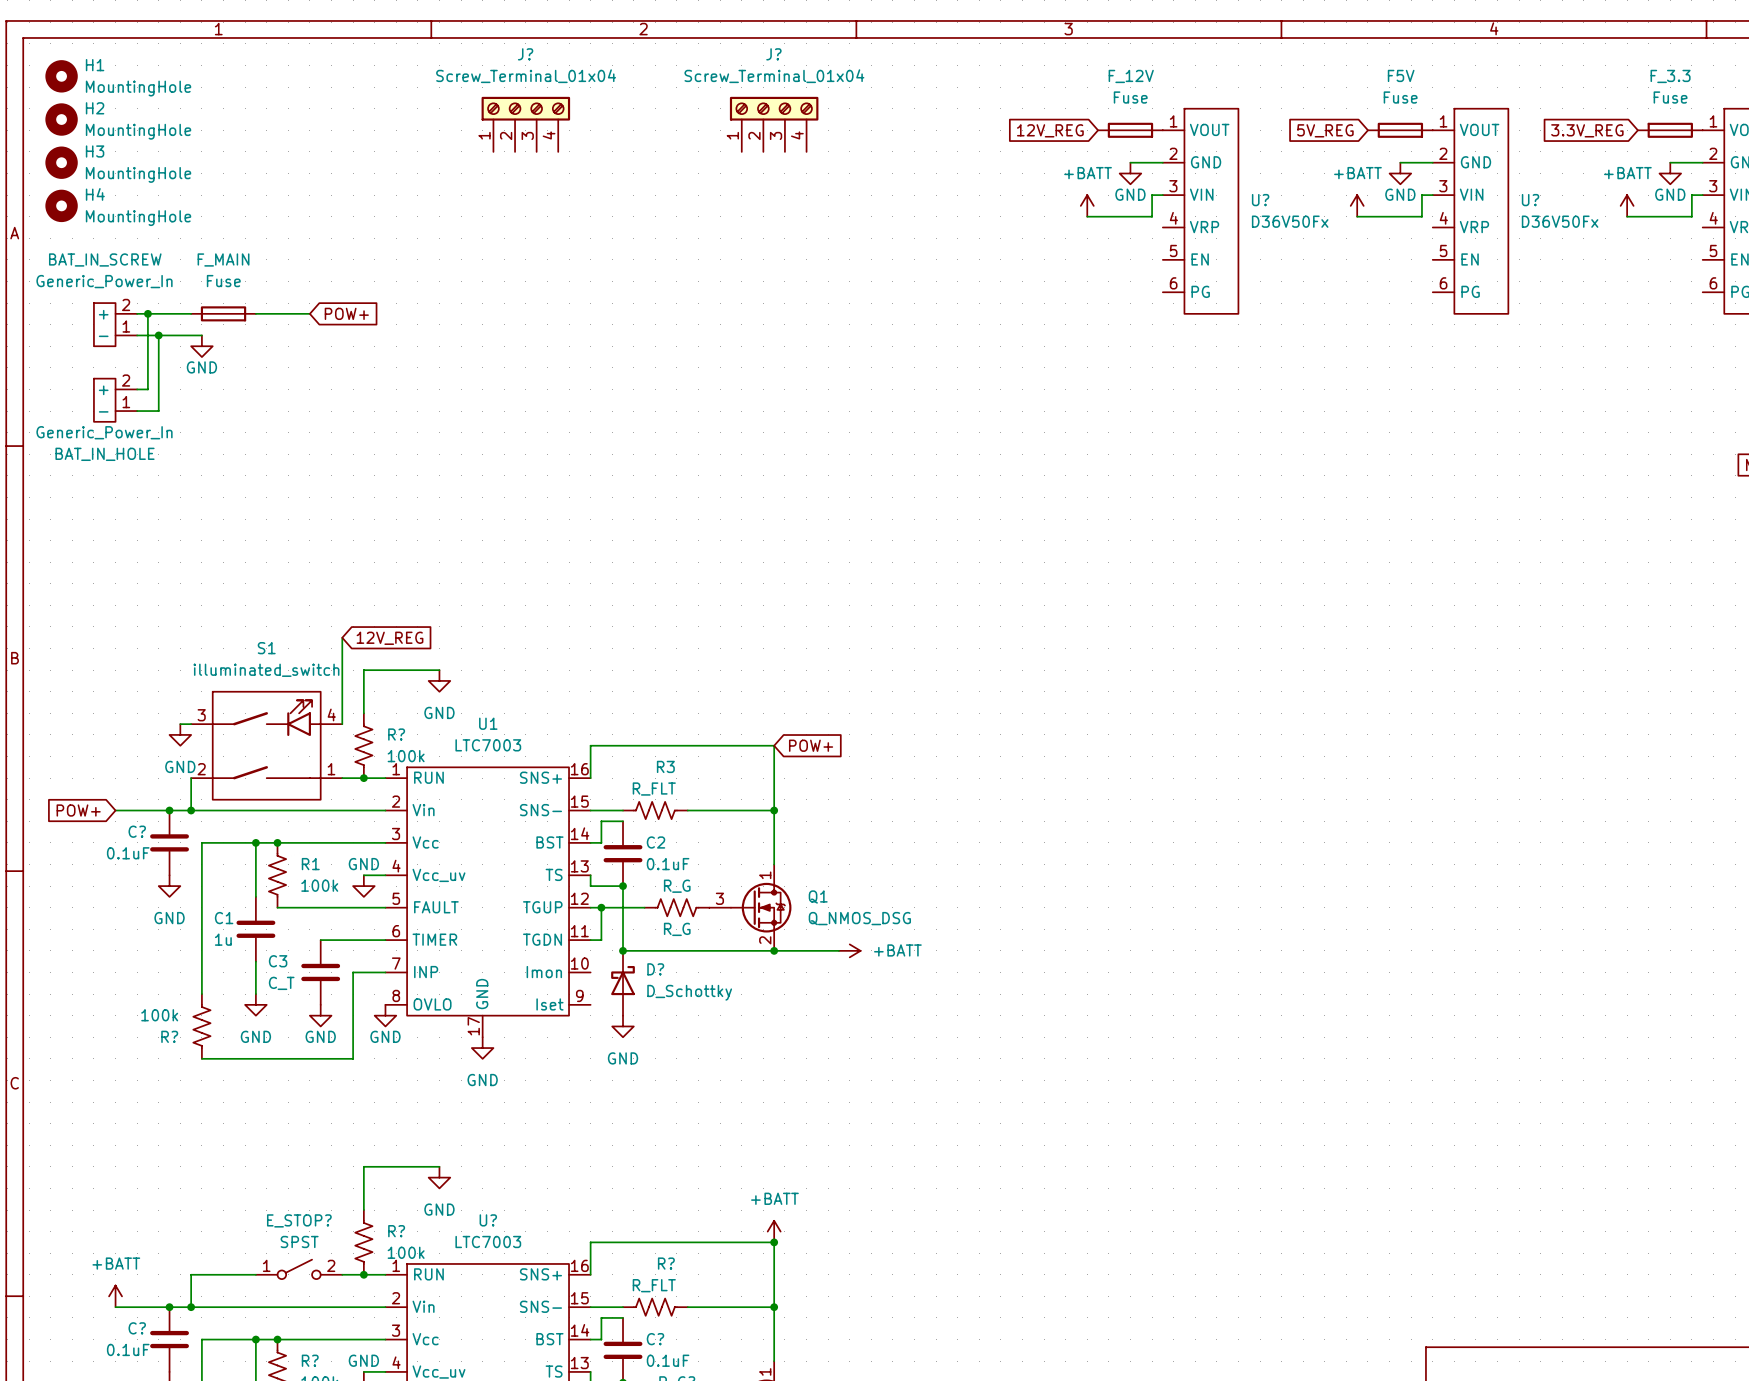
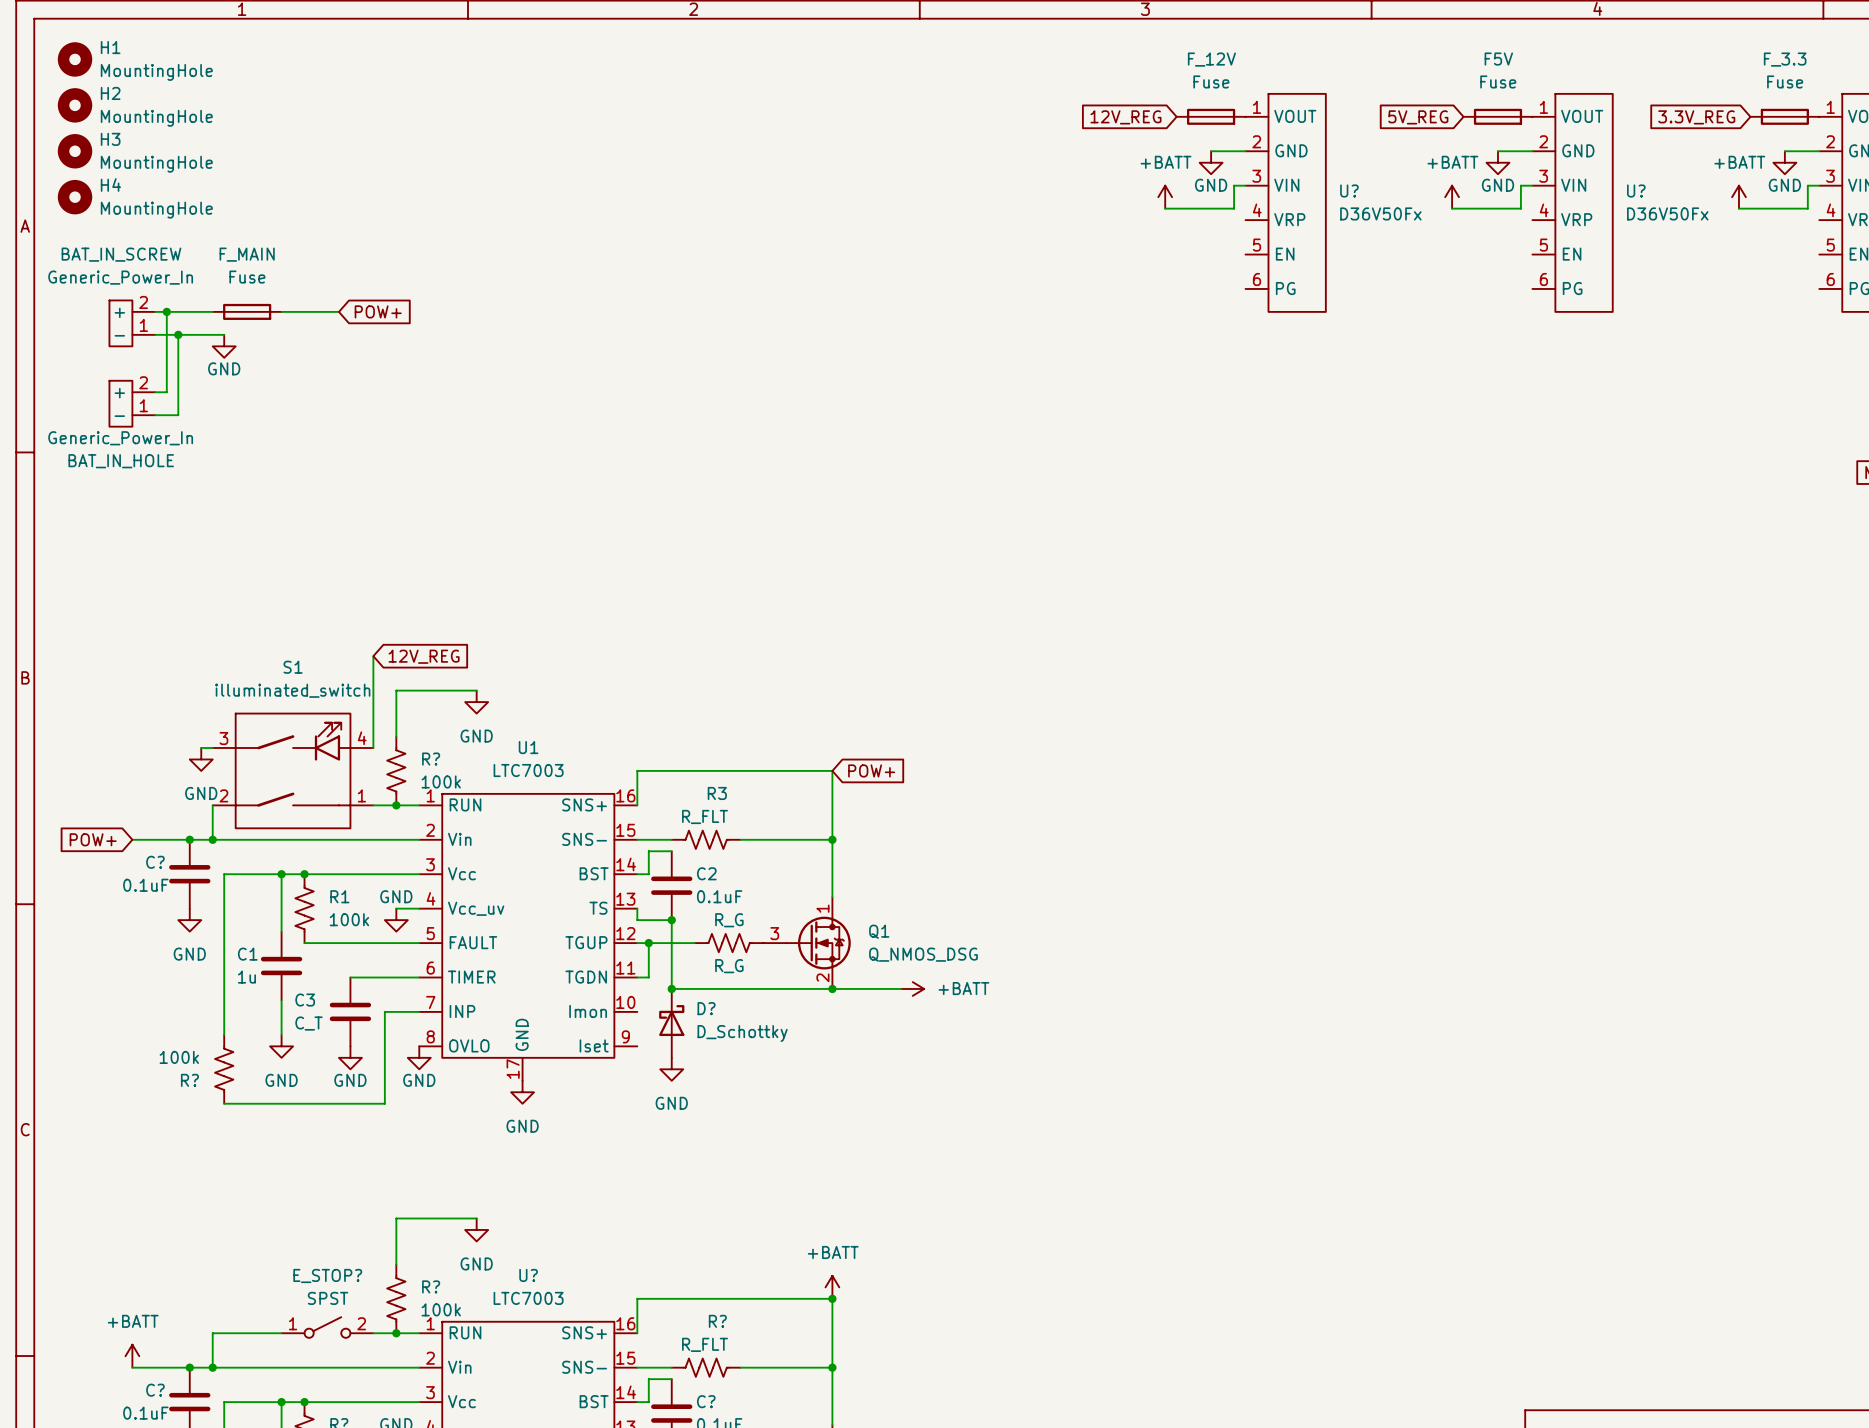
J?: Screw_Terminal_01x04 (525, 124) -> none
J?: Screw_Terminal_01x04 (774, 124) -> none

